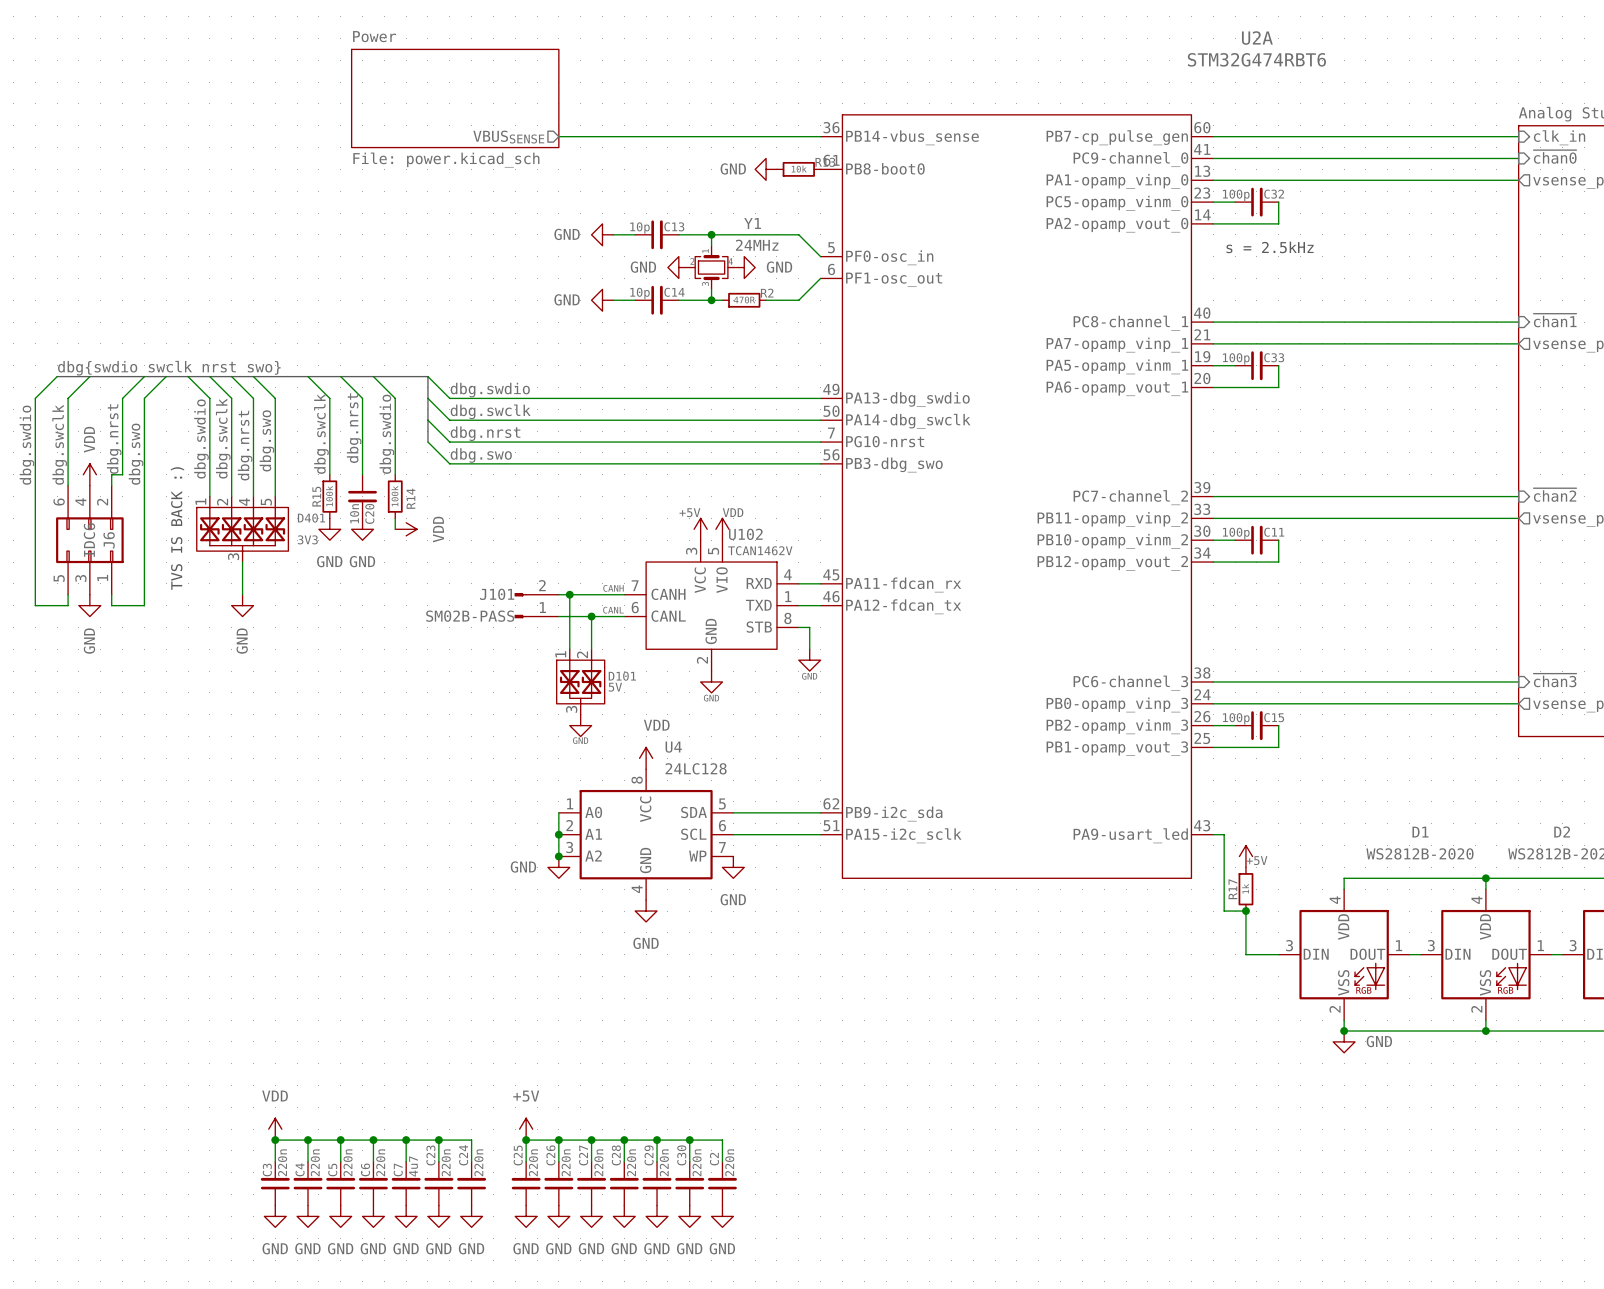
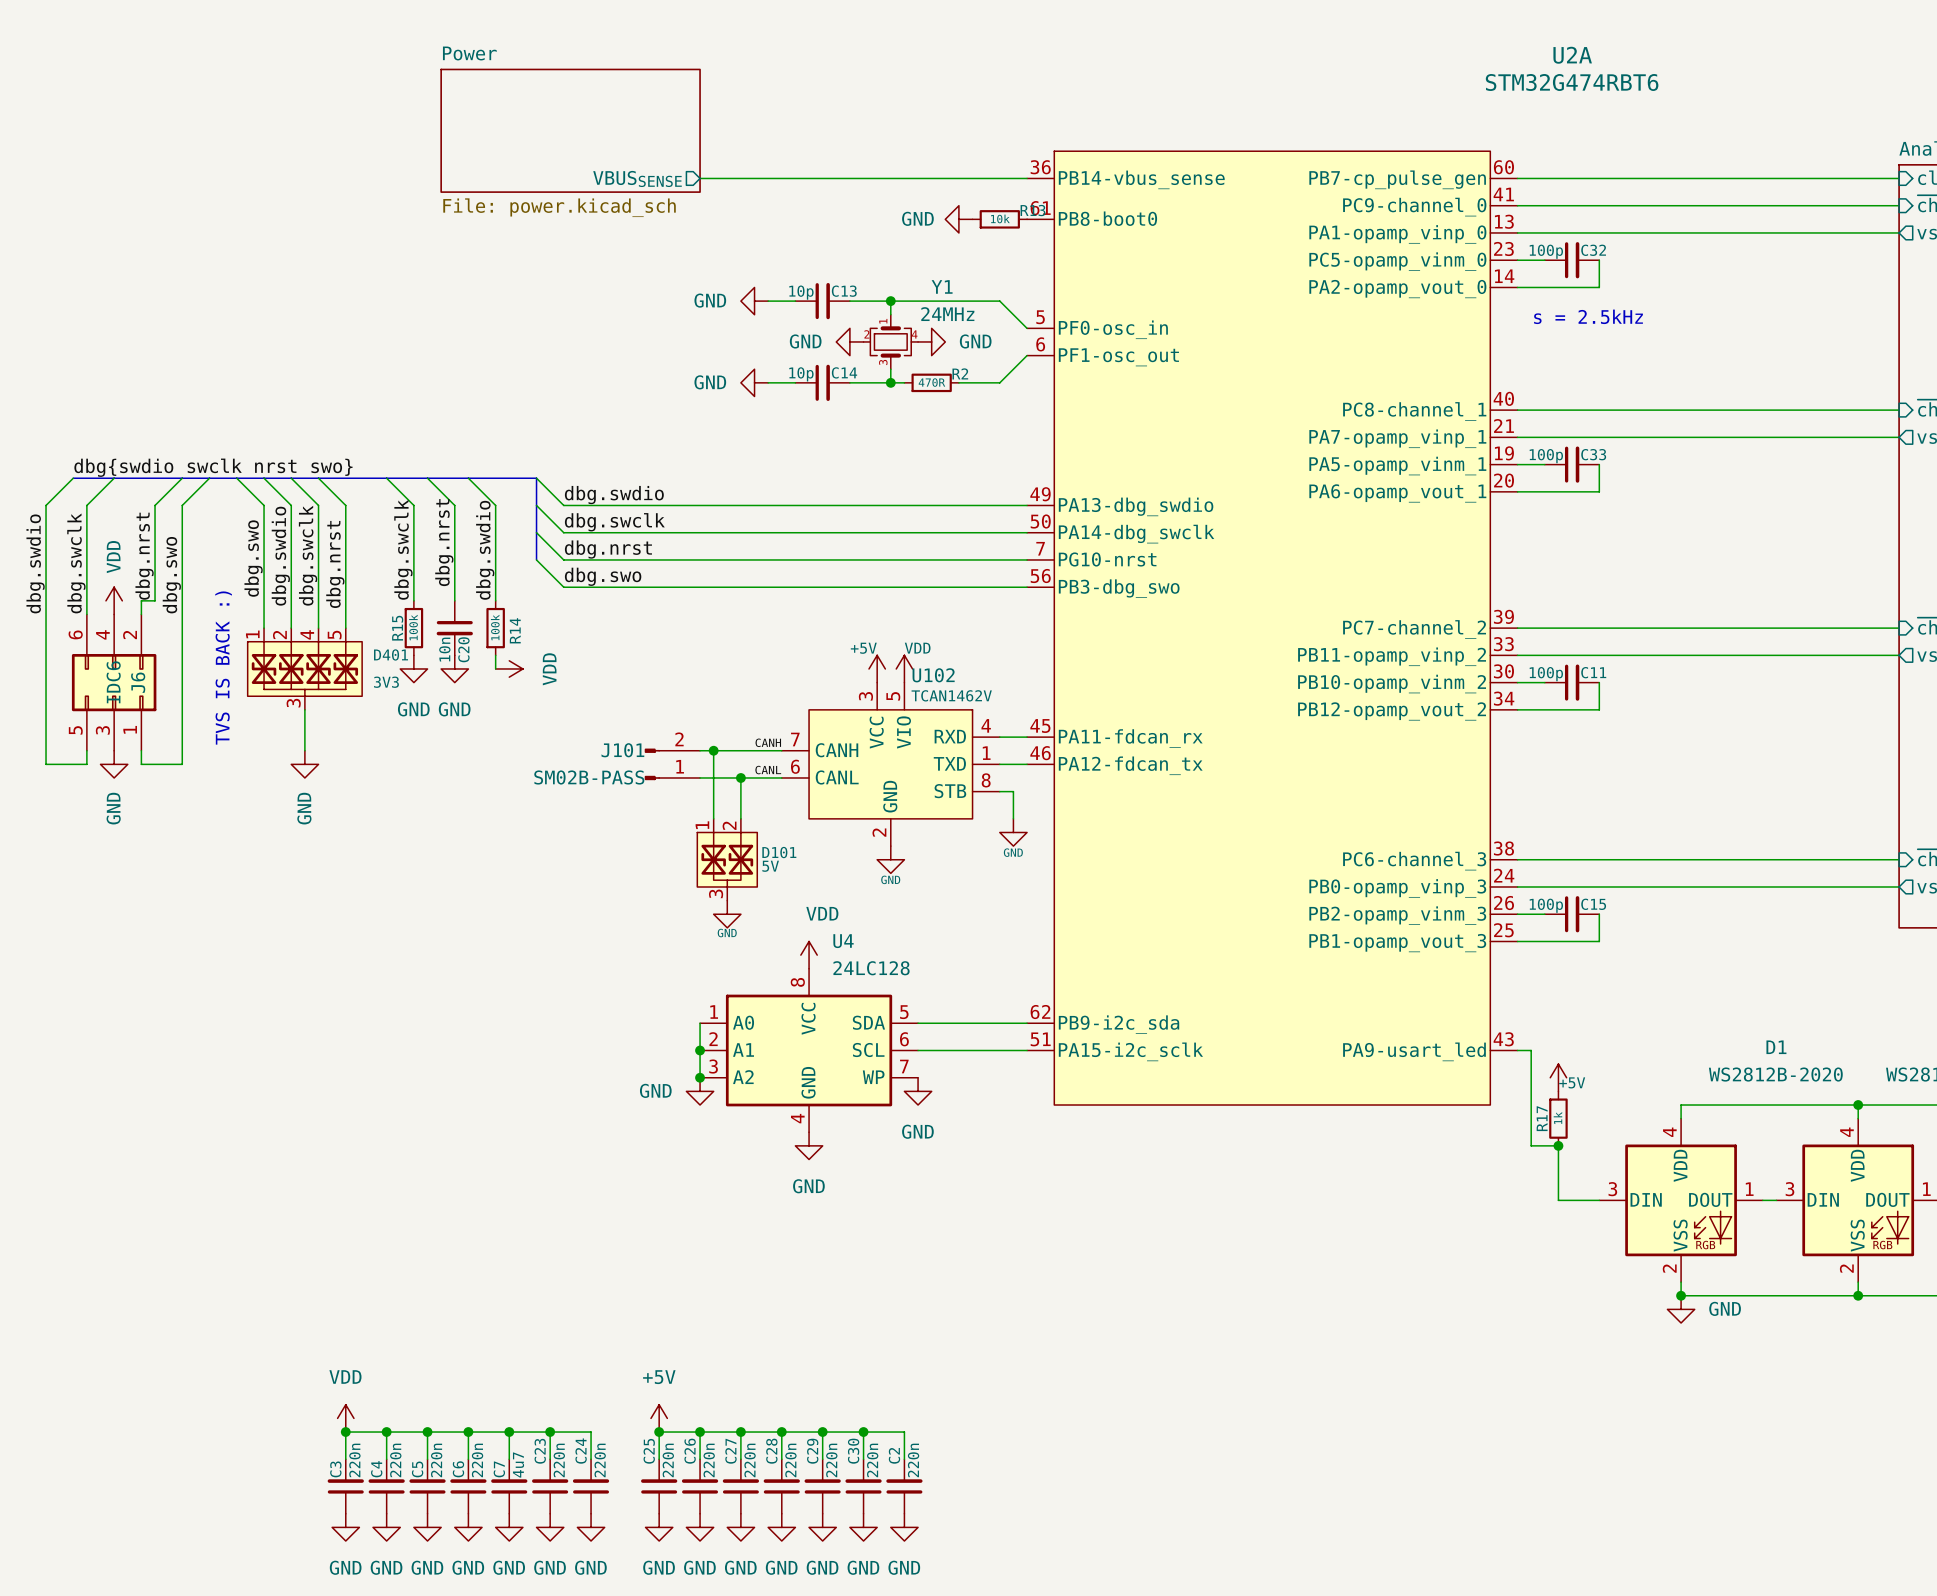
label: dbg.swdio (201, 438) -> dbg.swo (253, 558)
label: dbg.swclk (223, 438) -> dbg.swdio (280, 556)
label: none -> dbg.swclk (308, 555)
label: dbg.swo (266, 440) -> dbg.nrst (335, 564)
label: dbg.nrst (245, 445) -> none

